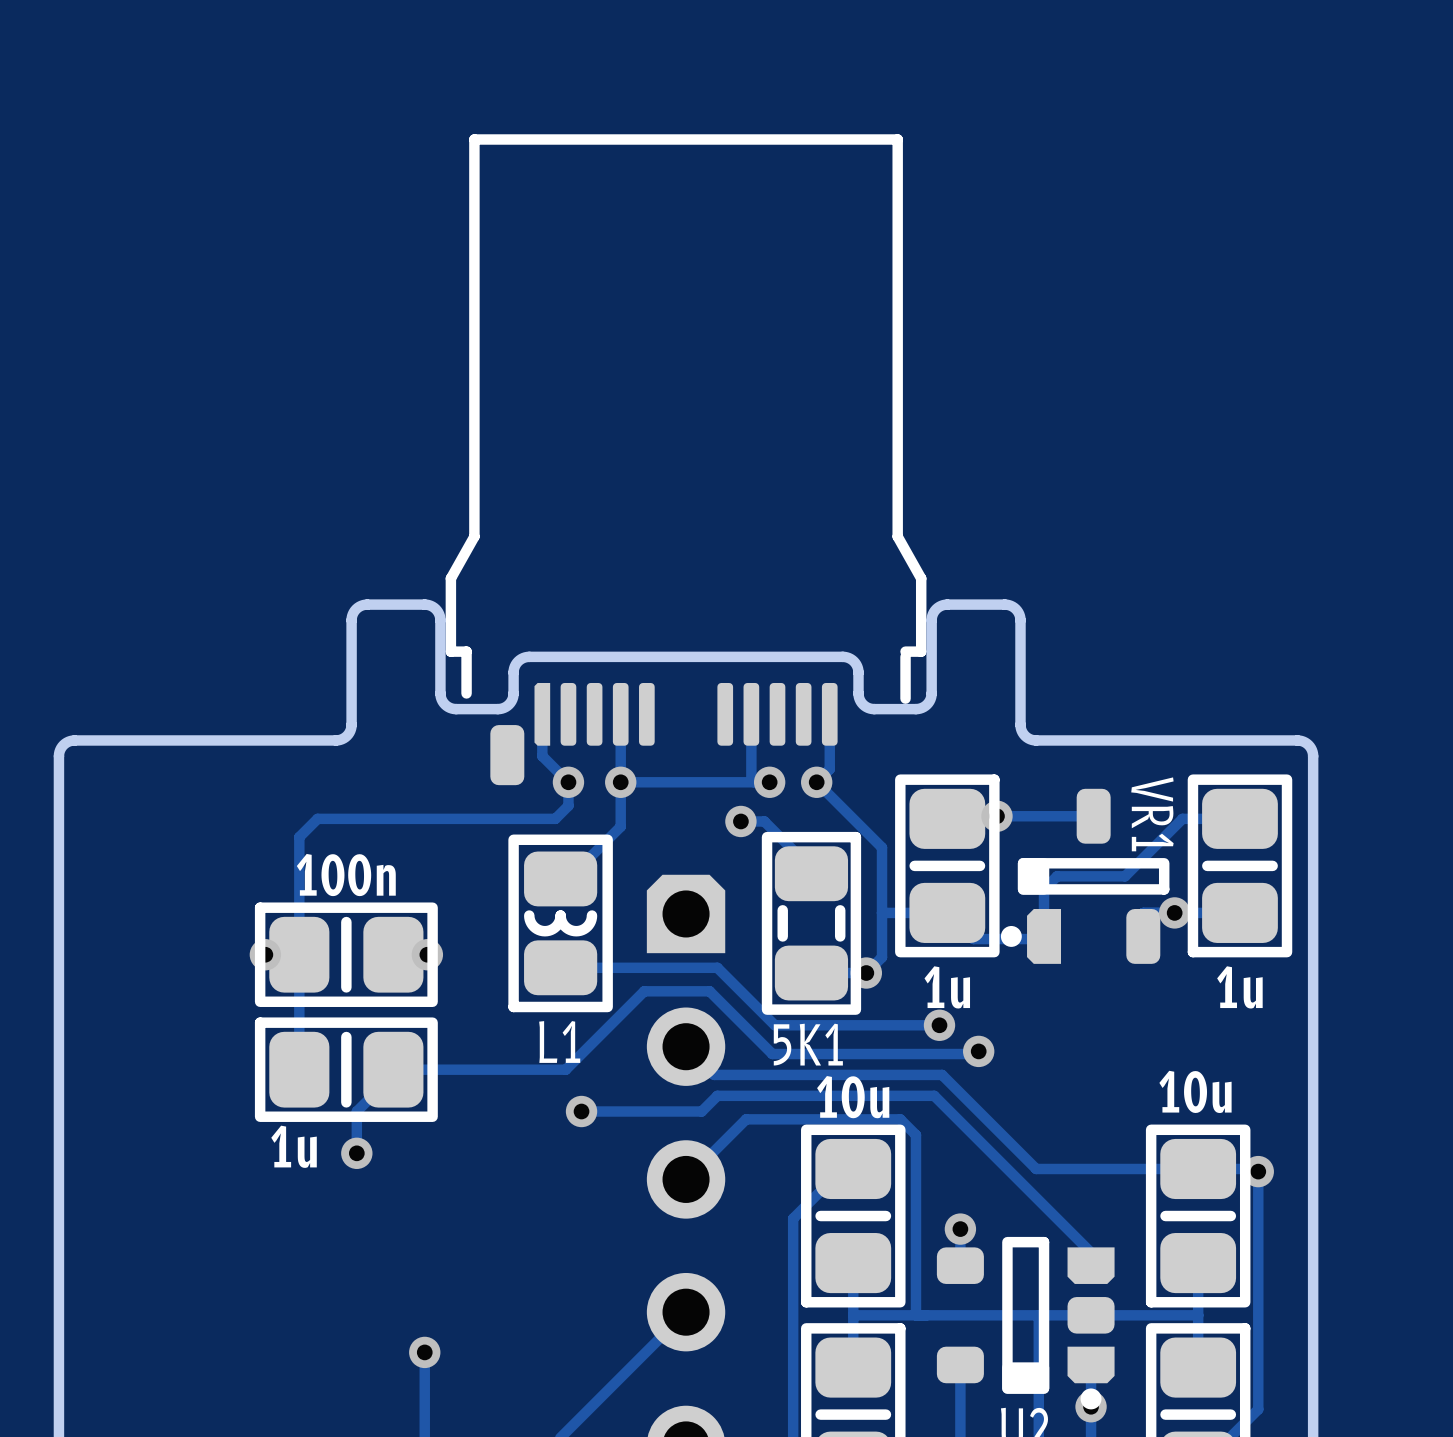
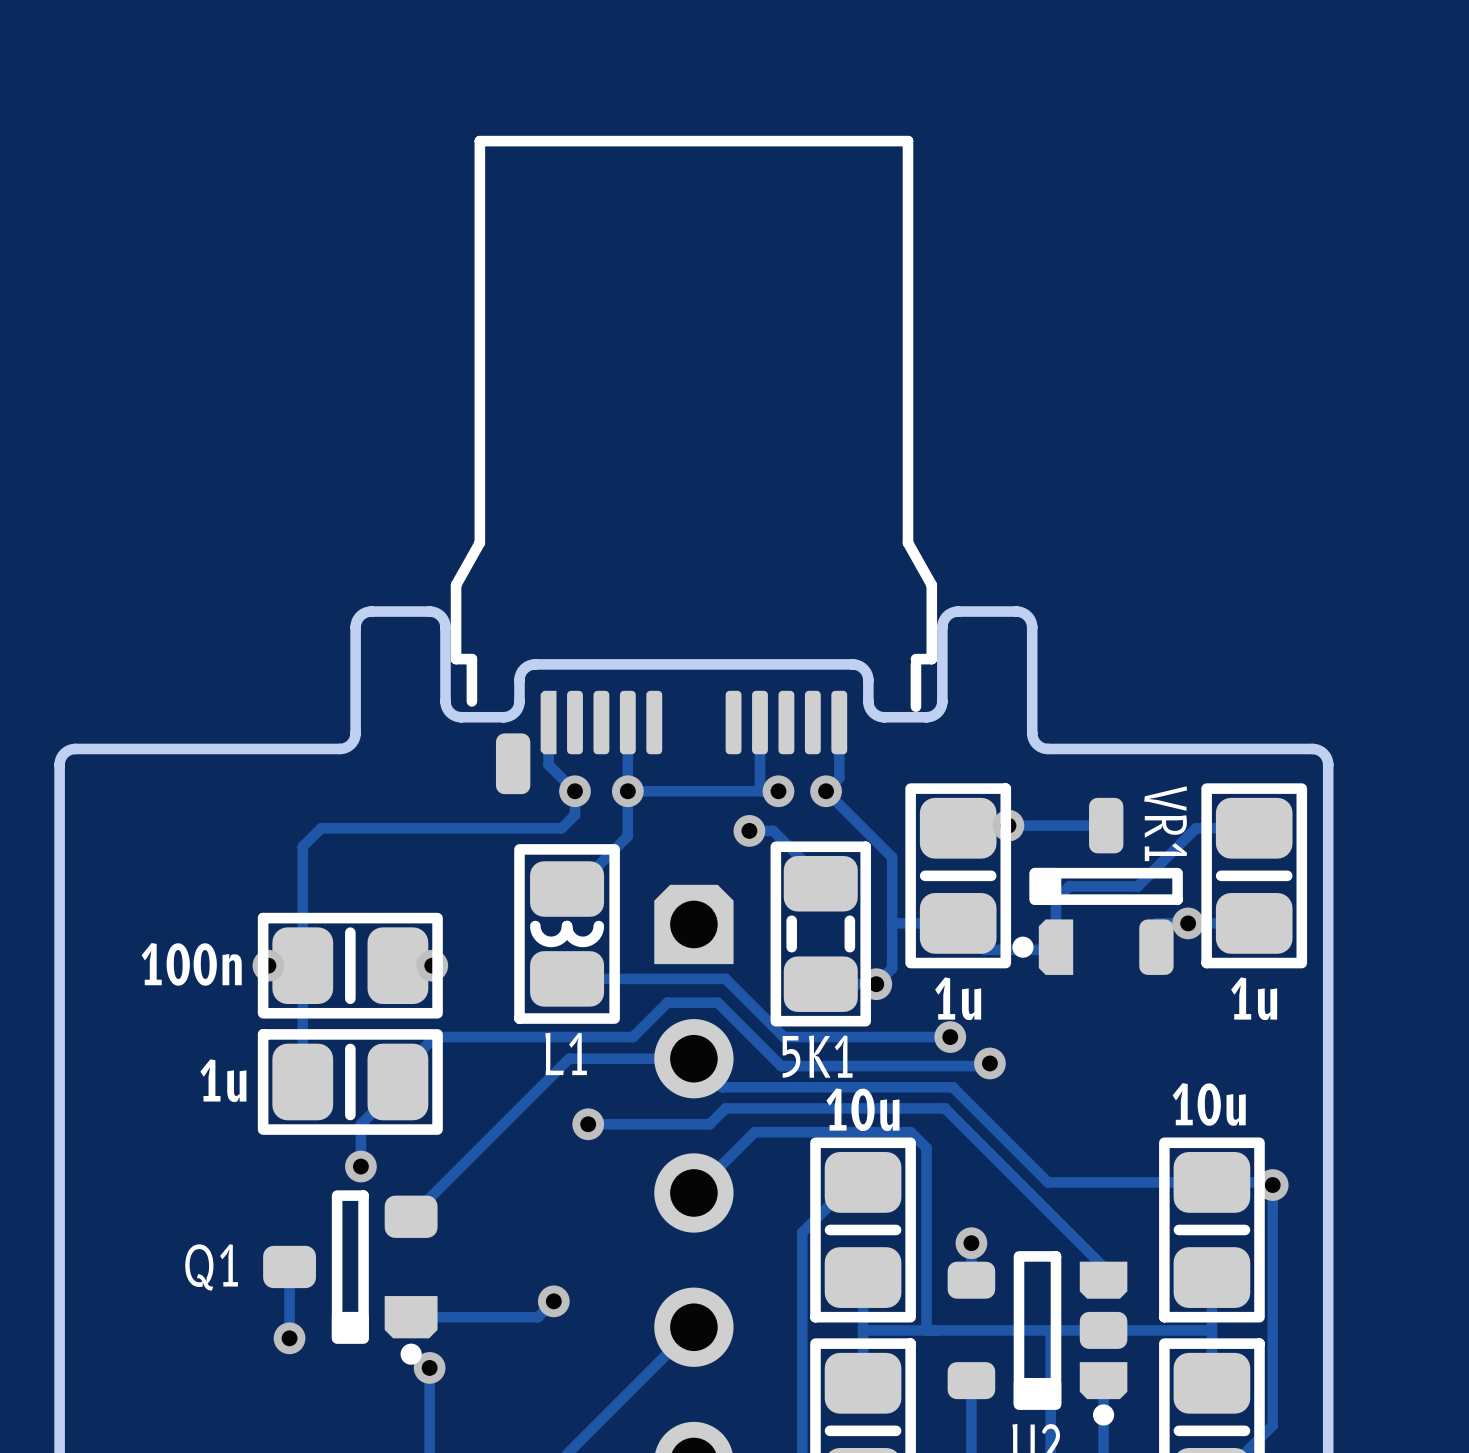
part value position: 100n (346, 875) -> 100n (191, 964)
track: (659, 991) (644, 991) (565, 1069) (393, 1069) -> (667, 1002) (633, 1037) (434, 1037) (397, 1074)
track: none -> (693, 1058) (569, 1058) (411, 1216)
part value position: 1u (294, 1146) -> 1u (223, 1080)
track: none -> (289, 1266) (289, 1338)
Q1: none -> (350, 1277)
track: none -> (553, 1301) (537, 1317) (411, 1317)
via: none -> (553, 1301)
via: none -> (289, 1338)
via: (1091, 1406) -> none

